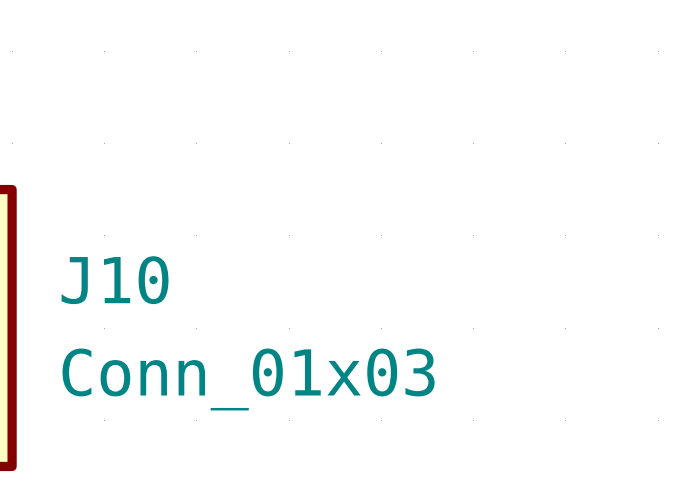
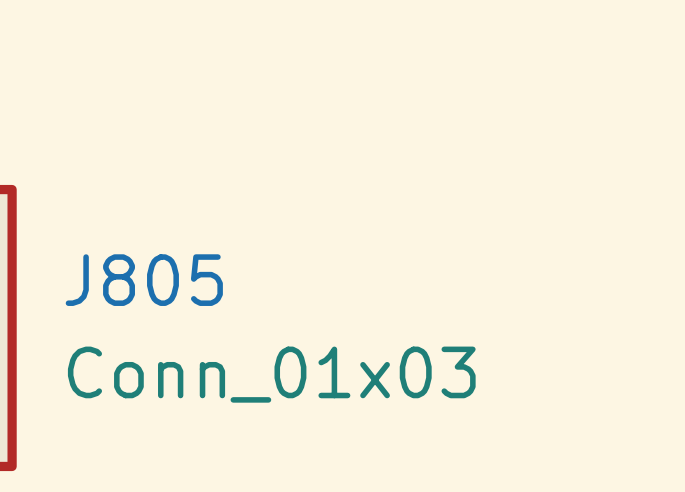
J10 name: J10 (115, 280) -> J805 (144, 280)

